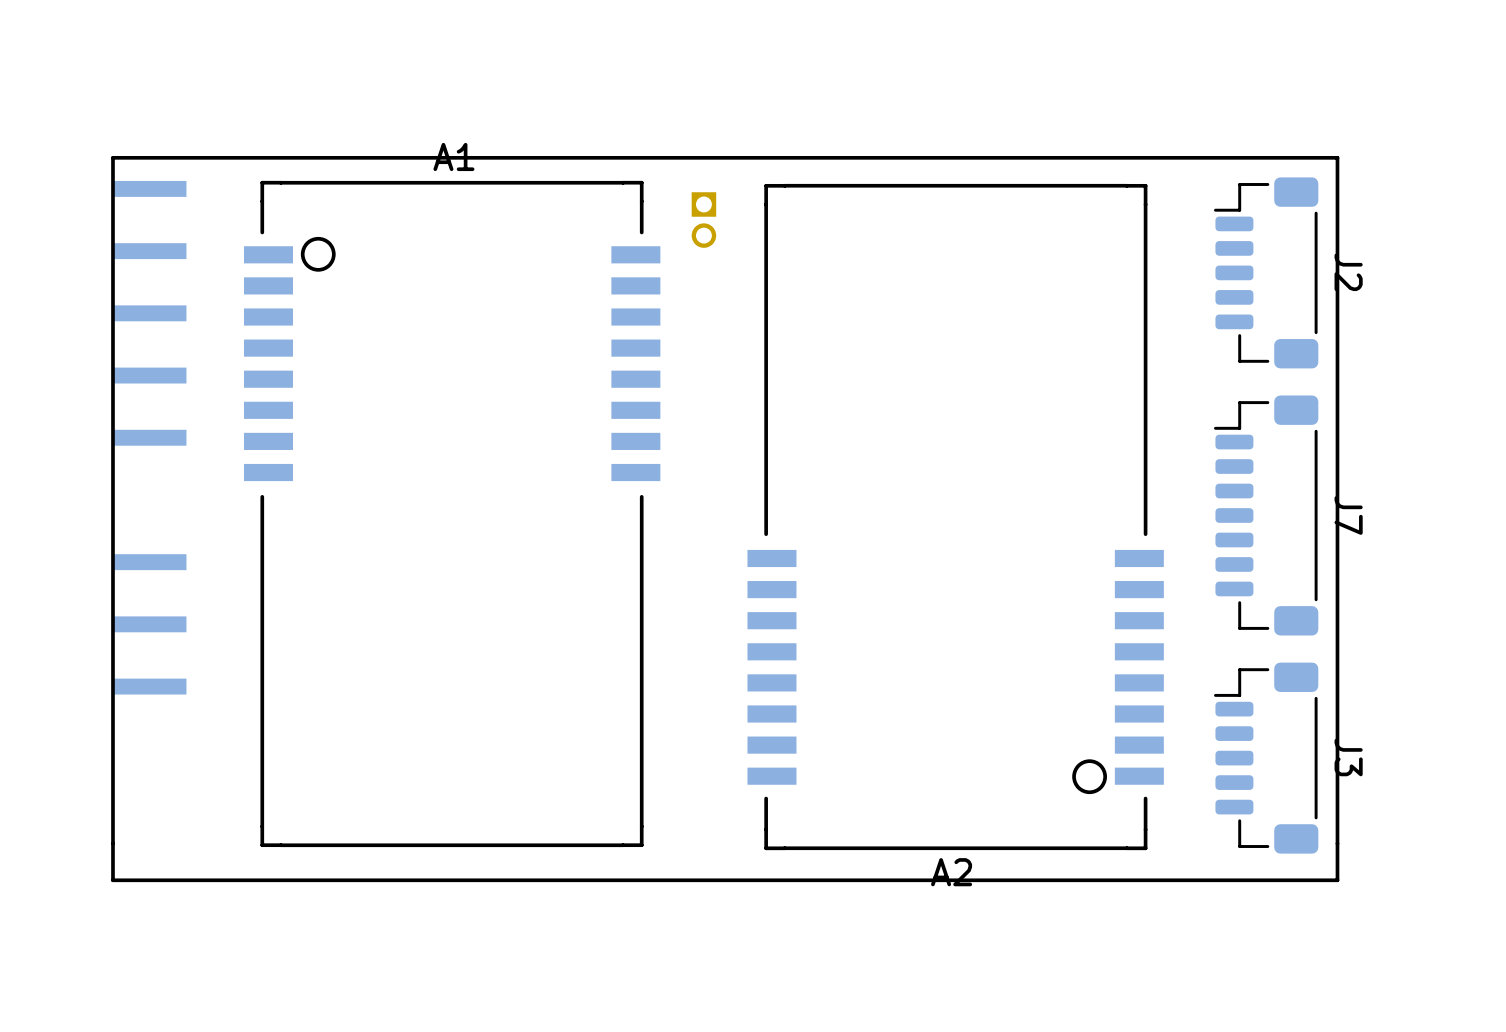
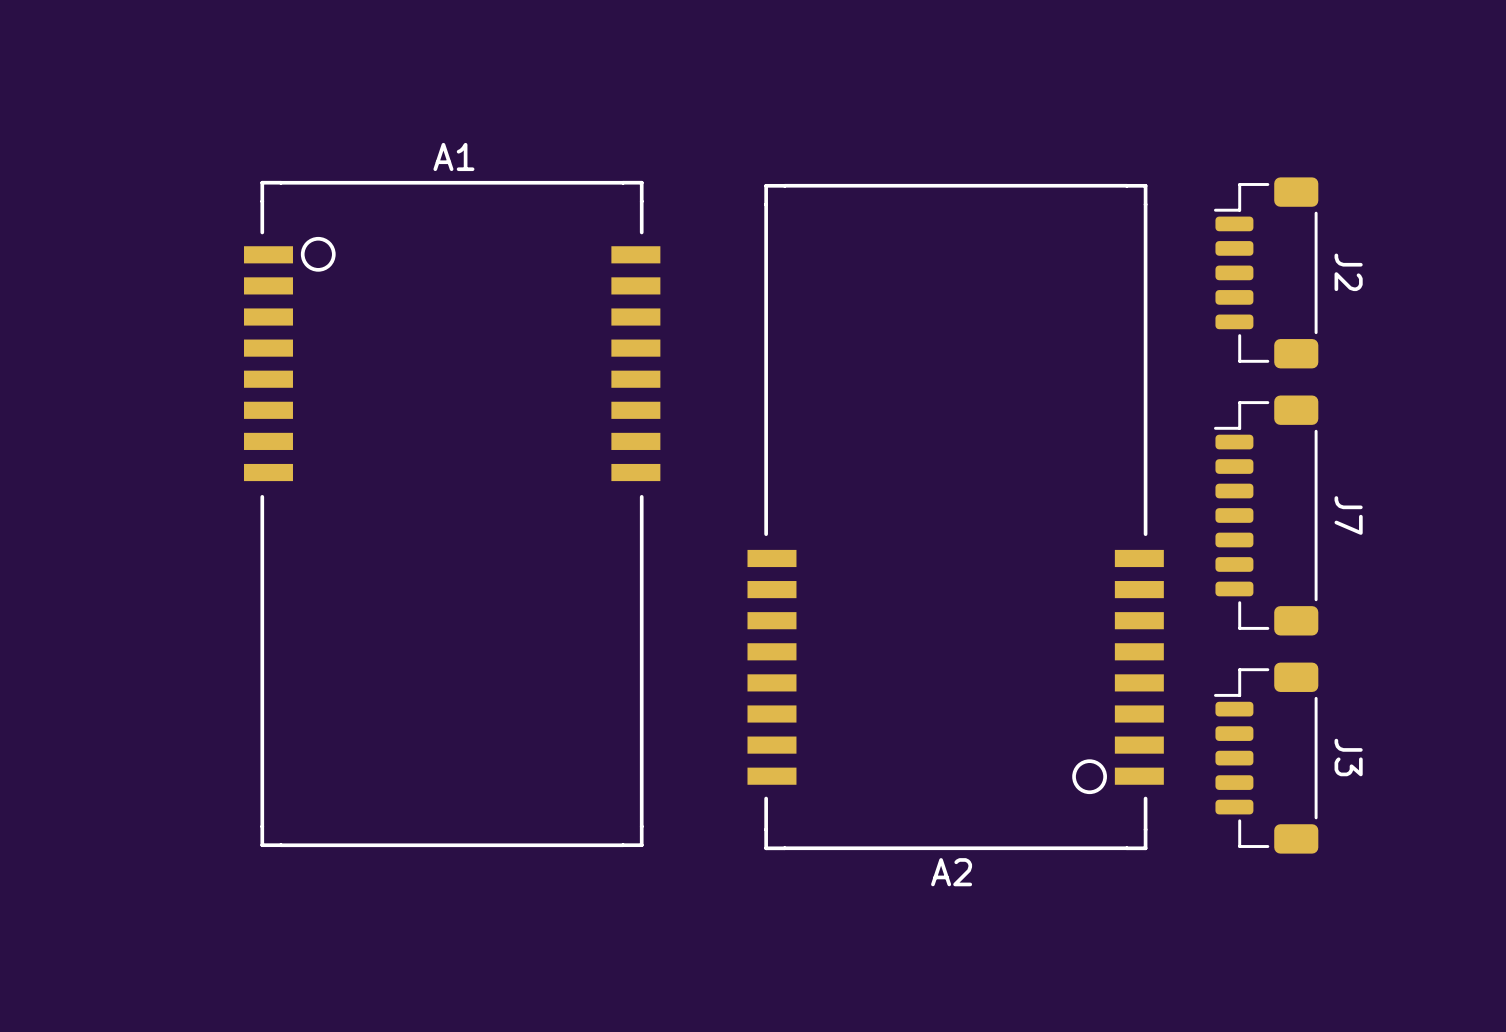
board edge: (1337, 157) (1337, 880) (112, 880) (112, 157) (1337, 157) -> none
part: (149, 188) -> none
part: (703, 220) -> none
part: (149, 251) -> none
part: (149, 313) -> none
part: (149, 375) -> none
part: (149, 437) -> none
part: (149, 562) -> none
part: (149, 624) -> none
part: (149, 686) -> none

